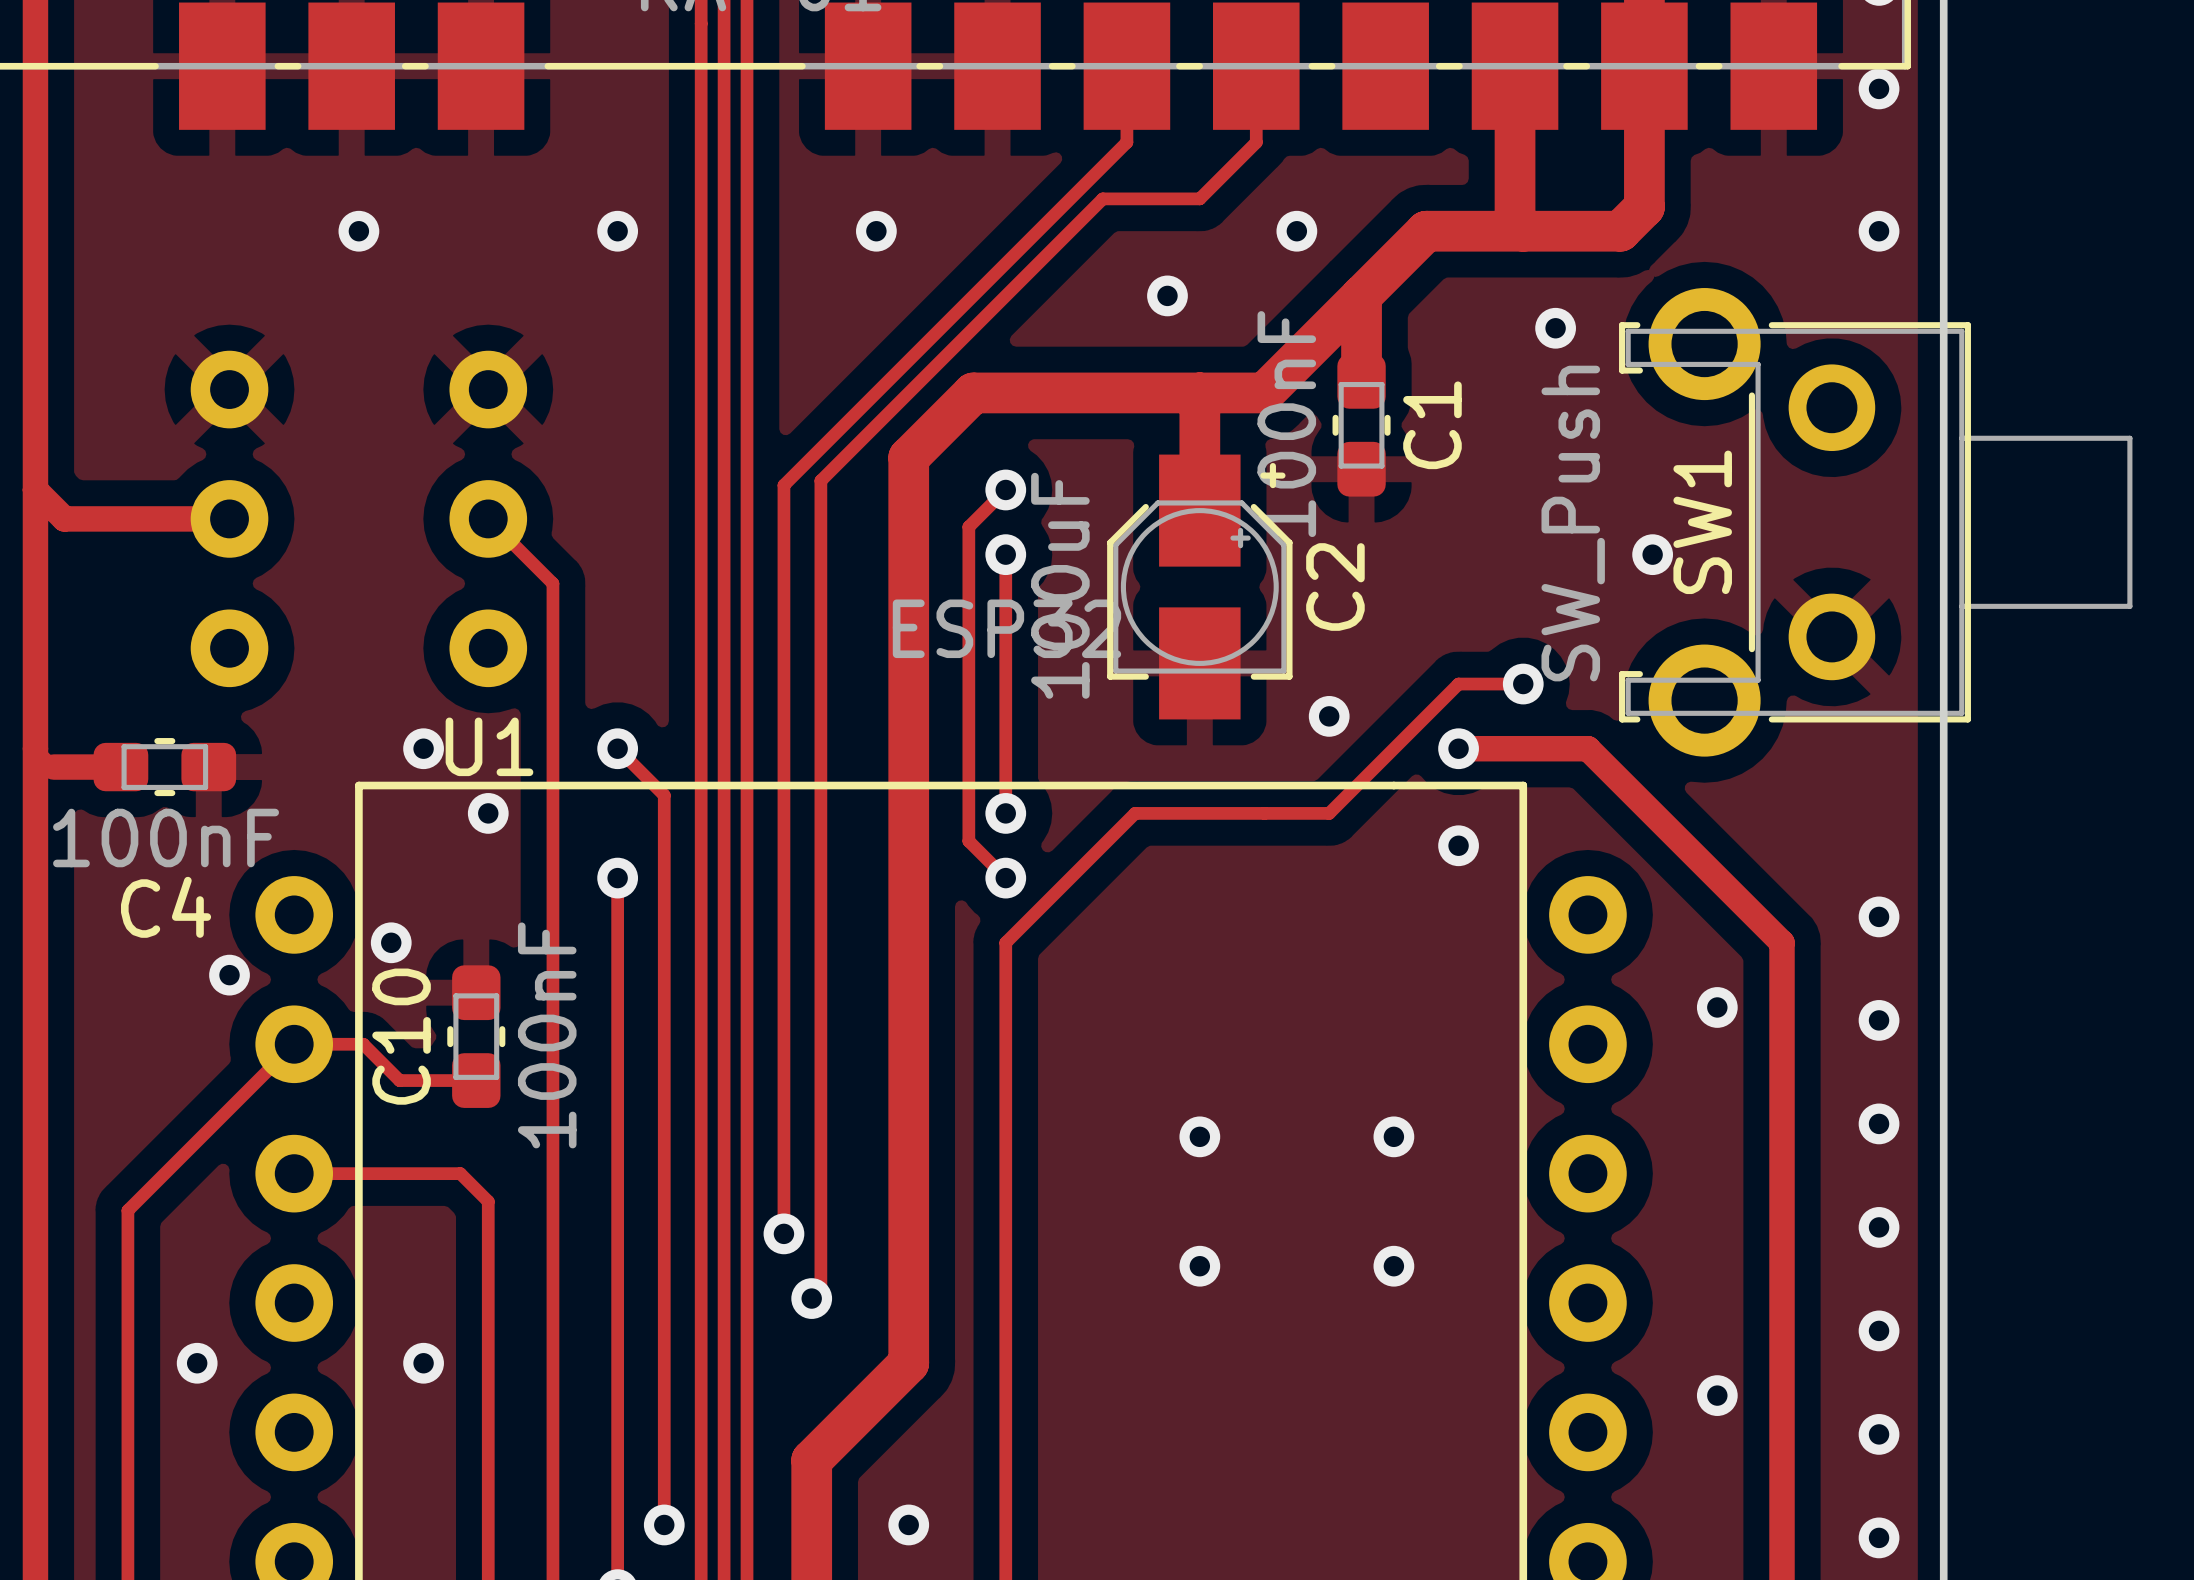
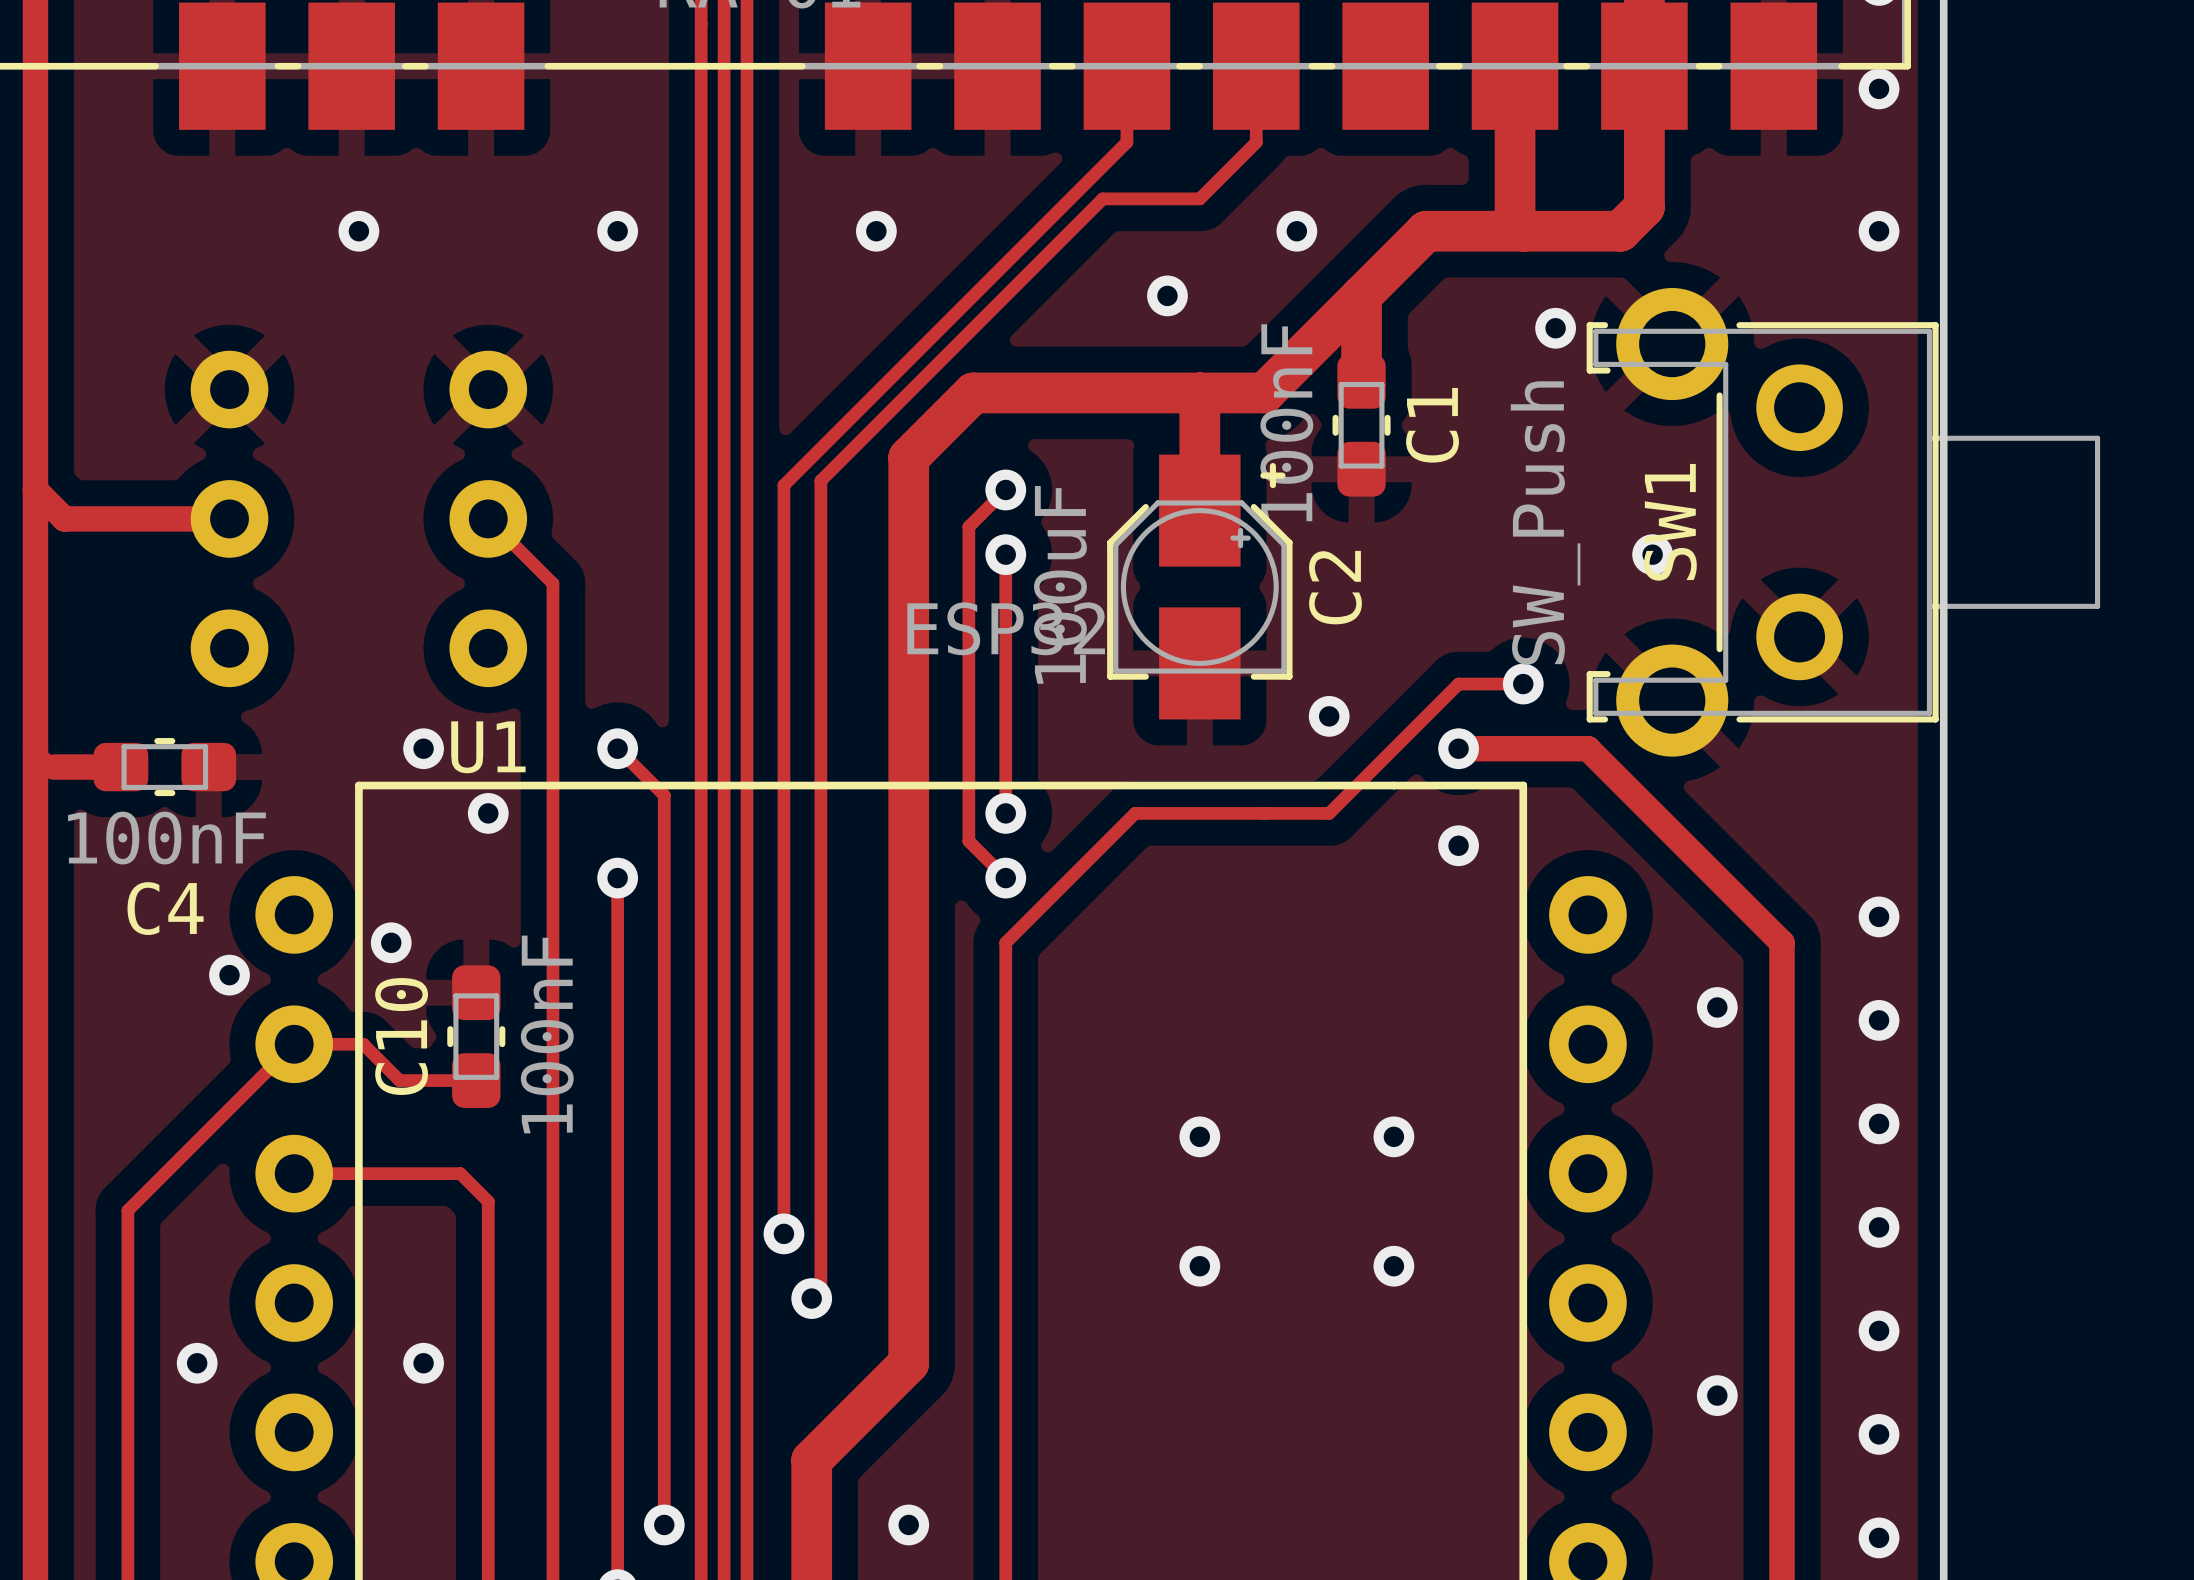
SW1 position: (1875, 522) -> (1843, 522)

